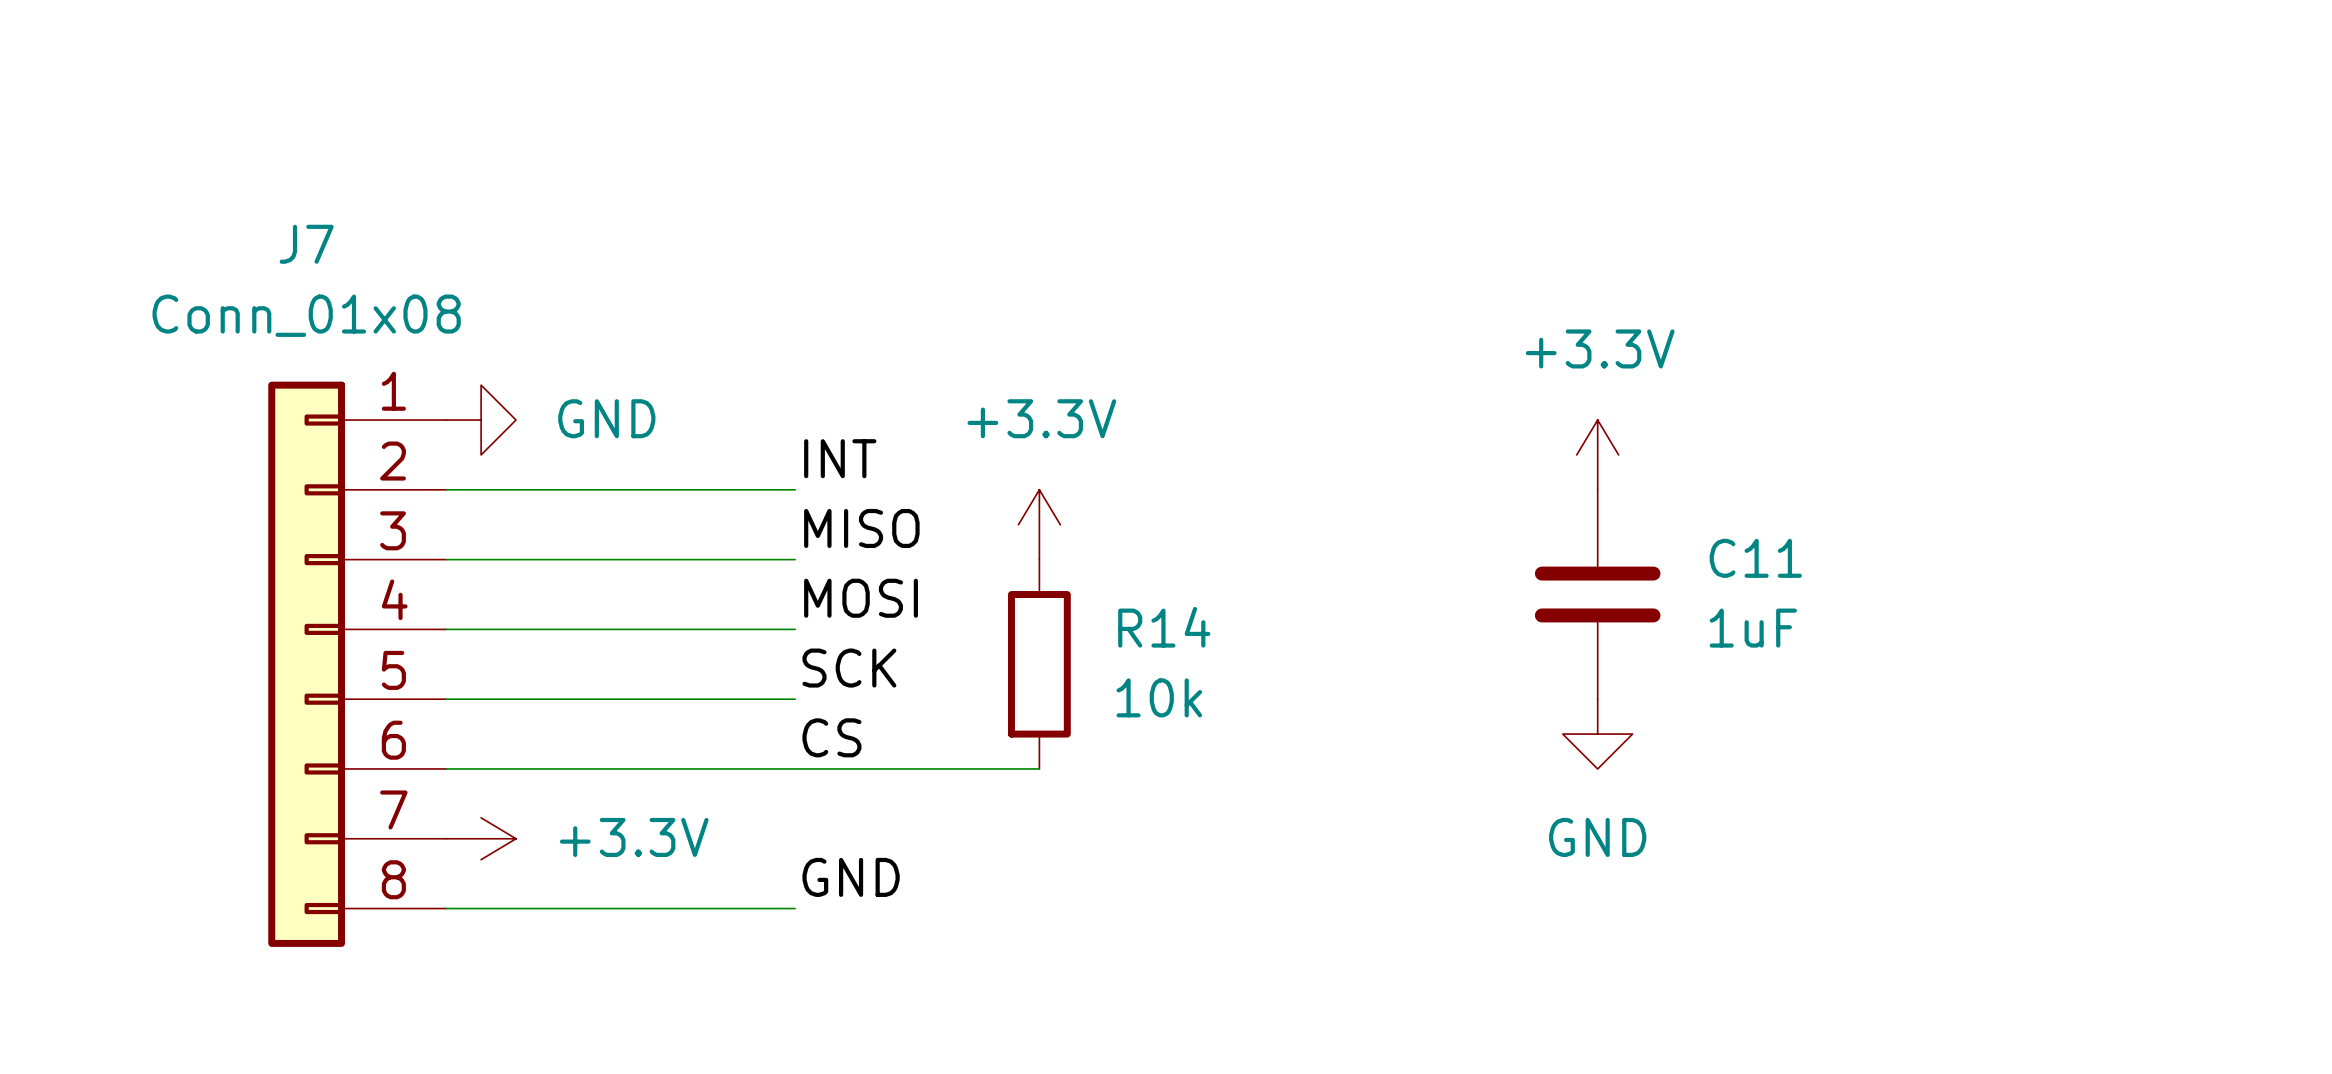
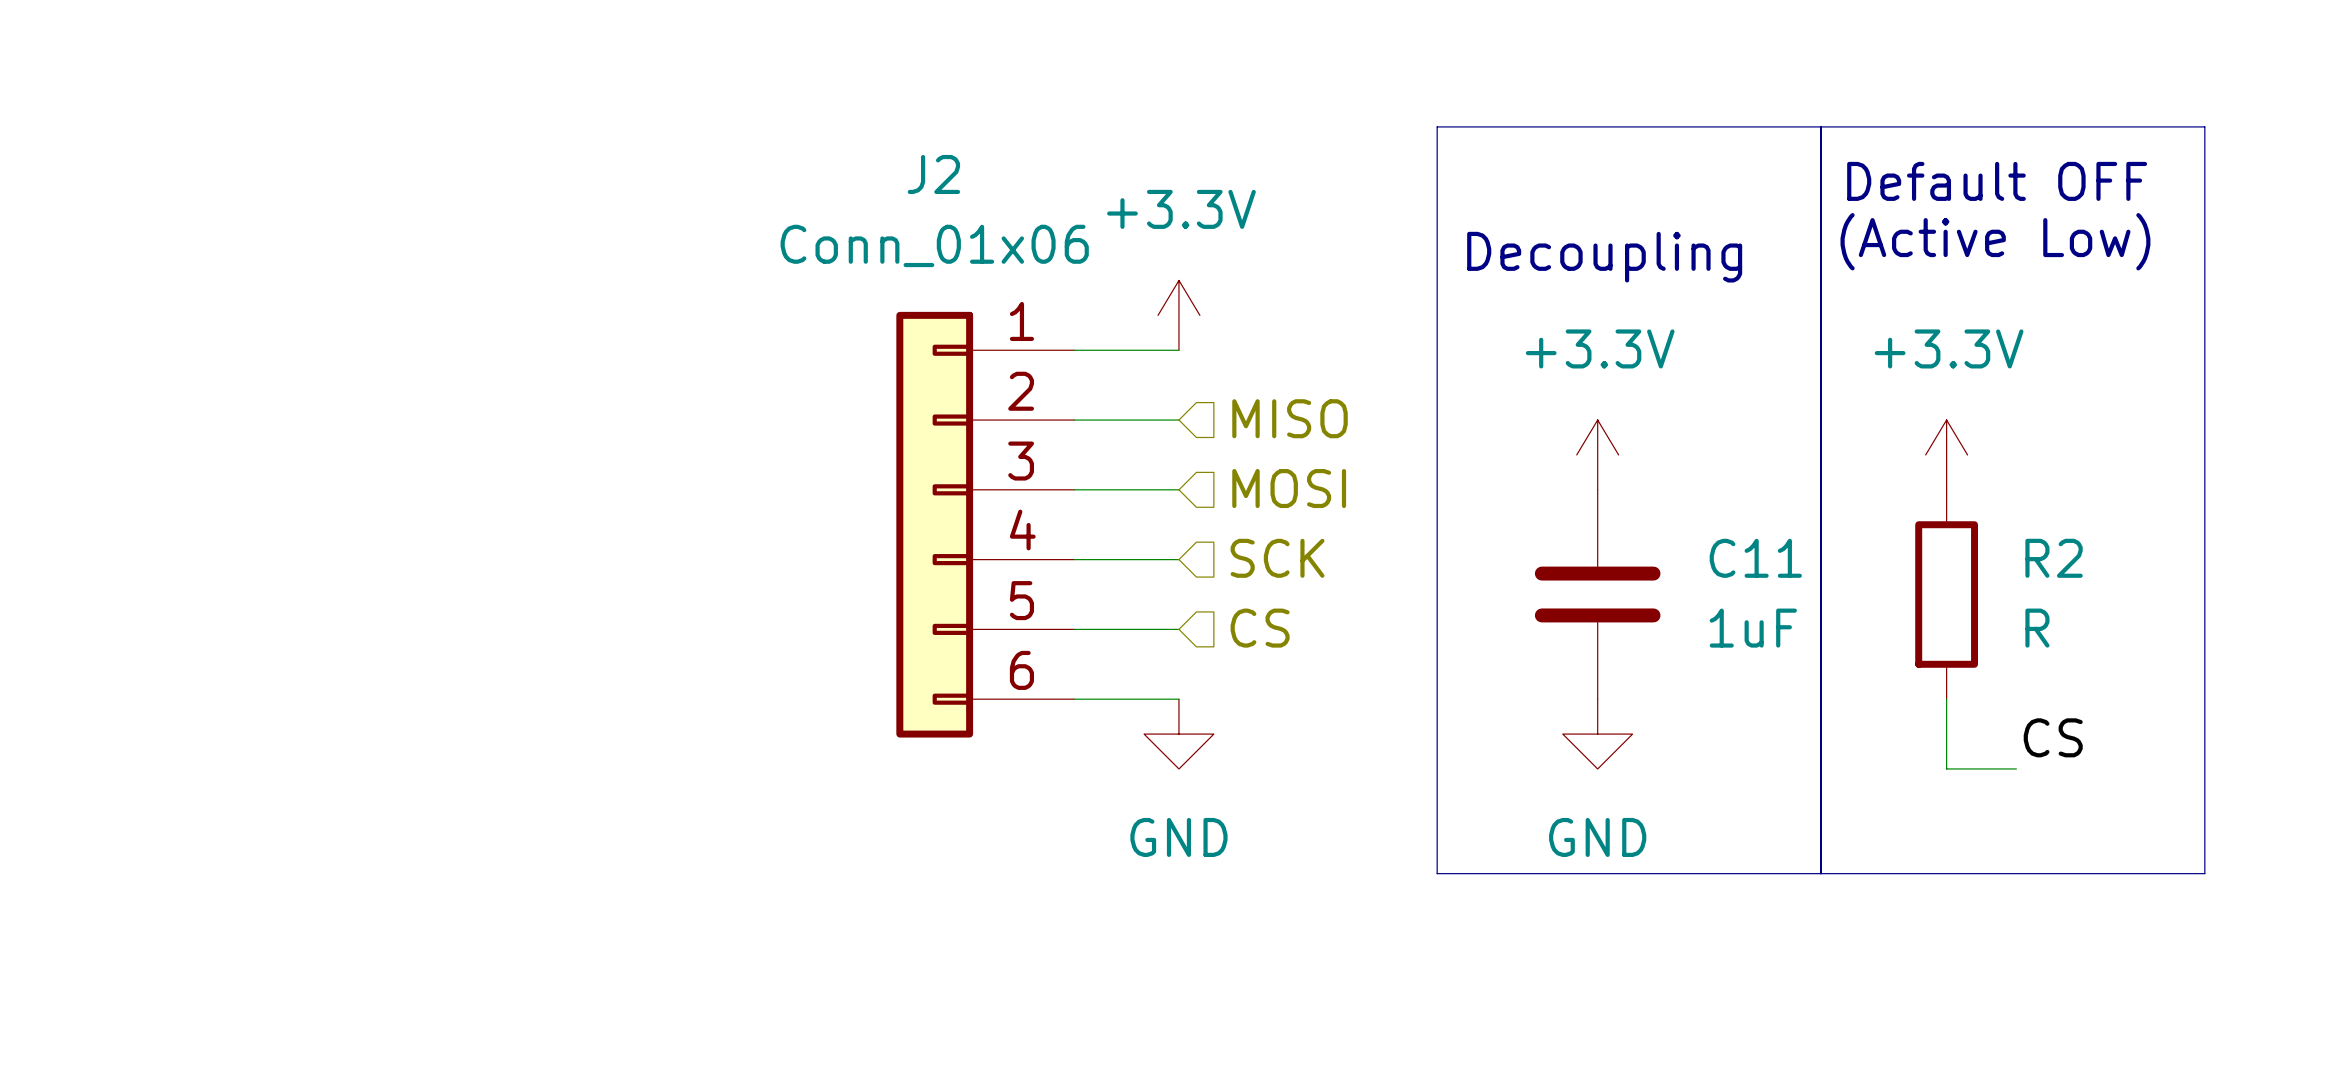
line: none -> (1437, 126) (2204, 126) (2204, 873) (1437, 873) (1437, 126)
line: none -> (1821, 126) (1821, 873)
text: none -> Default OFF (1997, 181)
text: none -> (Active Low) (1995, 241)
text: none -> Decoupling (1604, 257)
wire: none -> (1074, 350) (1178, 350)
hierarchical label: none -> MISO (1290, 418)
power symbol: GND (481, 420) -> none
wire: none -> (1074, 420) (1178, 420)
power symbol: none -> +3.3V (1946, 454)
label: INT (840, 458) -> none
hierarchical label: none -> MOSI (1289, 488)
wire: (446, 489) (795, 489) -> none
wire: none -> (1074, 489) (1178, 489)
J2: none -> Conn_01x06 (985, 524)
power symbol position: +3.3V (1039, 524) -> +3.3V (1178, 315)
label: MISO (861, 528) -> none
hierarchical label: none -> SCK (1277, 558)
wire: (446, 559) (795, 559) -> none
wire: none -> (1074, 559) (1178, 559)
R2: none -> R (1946, 594)
label: MOSI (861, 598) -> none
hierarchical label: none -> CS (1260, 628)
wire: (446, 629) (795, 629) -> none
wire: none -> (1074, 629) (1178, 629)
J7: Conn_01x08 (357, 664) -> none
R14: 10k (1039, 664) -> none
label: SCK (849, 668) -> none
wire: (446, 699) (795, 699) -> none
wire: none -> (1074, 699) (1178, 699)
wire: none -> (1946, 699) (1946, 768) (2016, 768)
power symbol: none -> GND (1178, 734)
label: CS (831, 737) -> none
label: none -> CS (2053, 737)
wire: (446, 768) (1039, 768) -> none
power symbol: +3.3V (481, 838) -> none
label: GND (851, 877) -> none
wire: (446, 908) (795, 908) -> none

